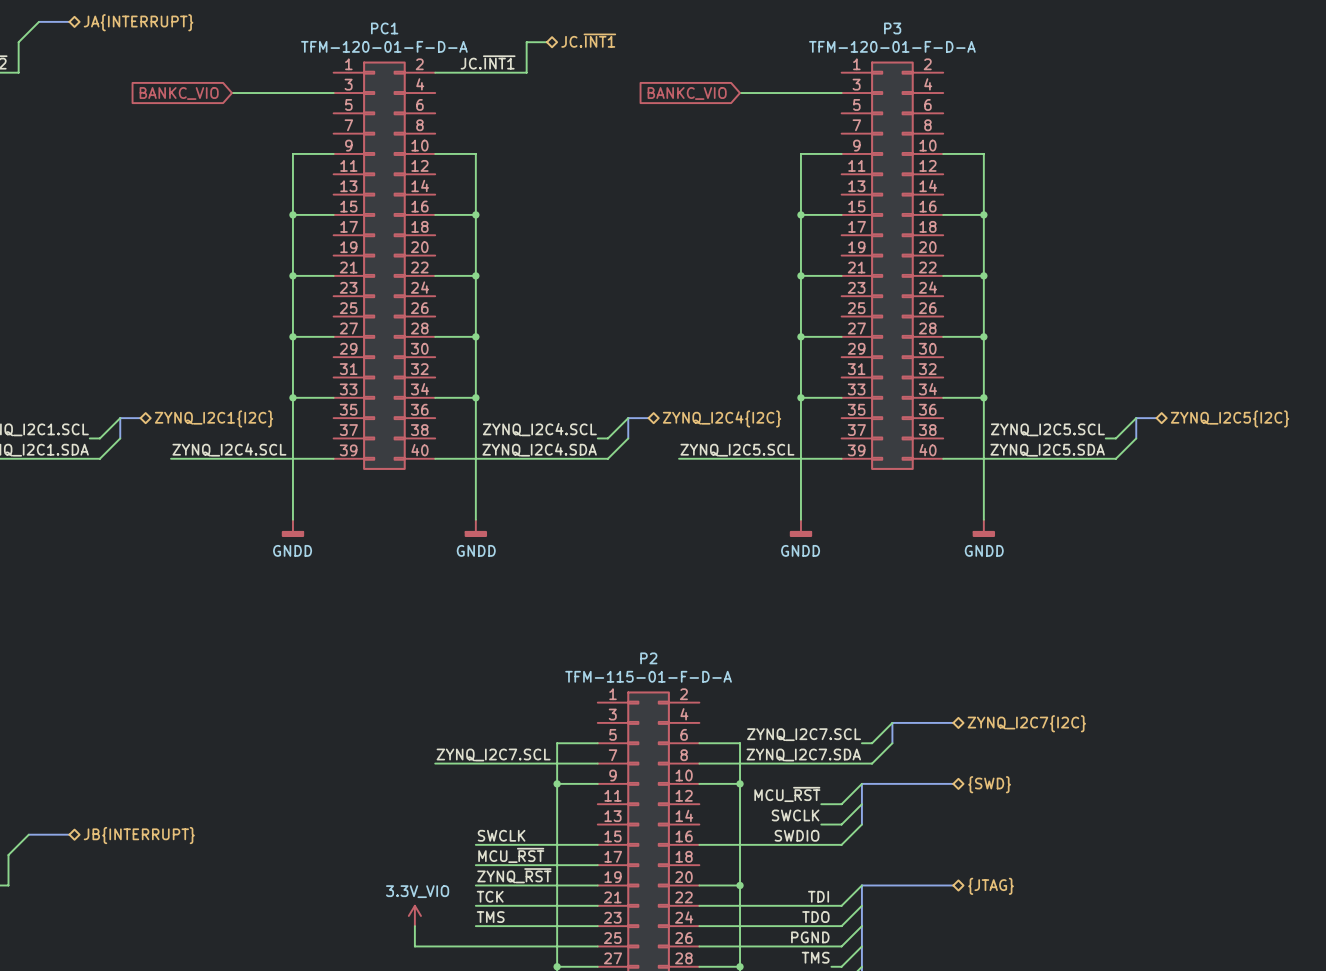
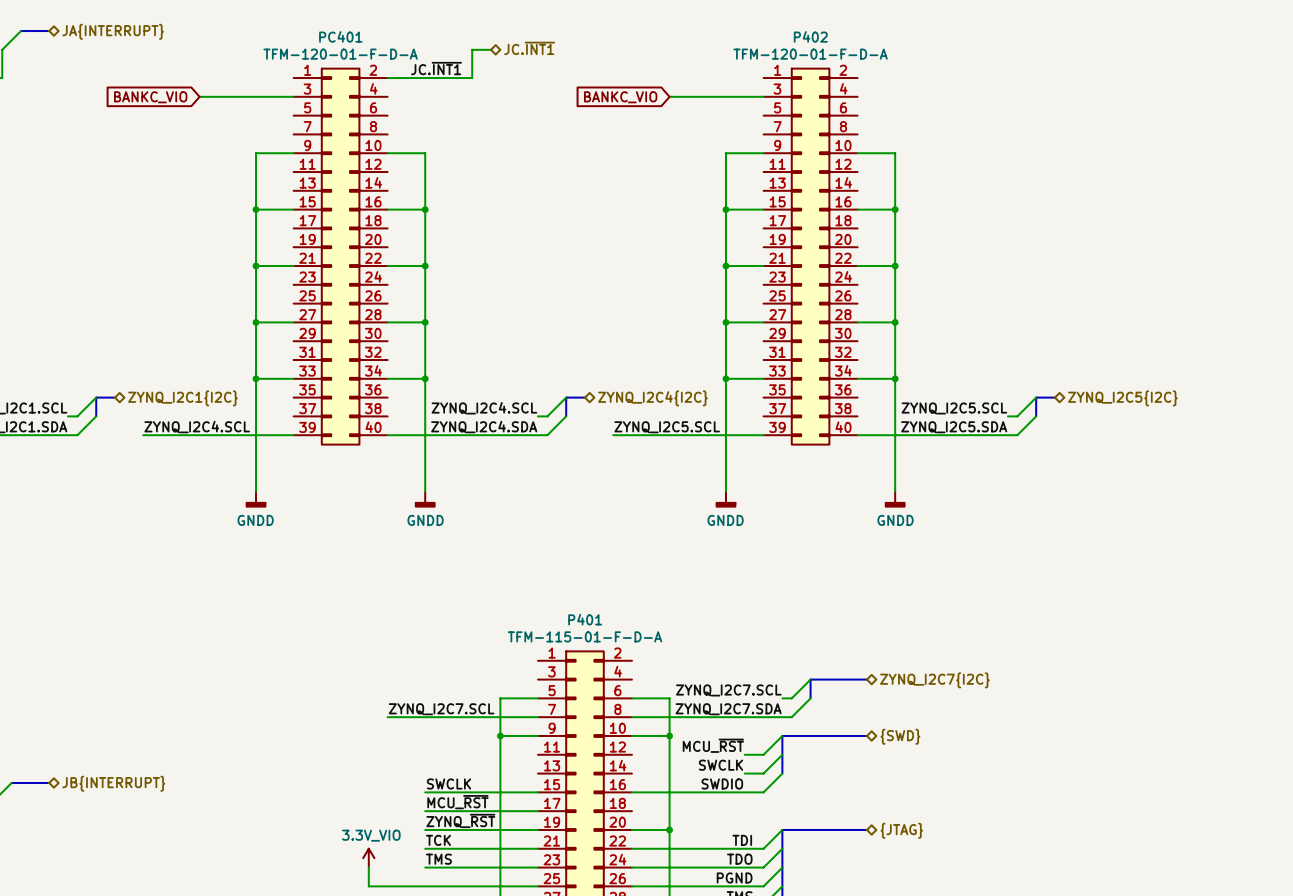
PC1 name: PC1 (384, 28) -> PC401 (340, 36)
P3 name: P3 (892, 28) -> P402 (810, 36)
P2 name: P2 (648, 658) -> P401 (585, 619)

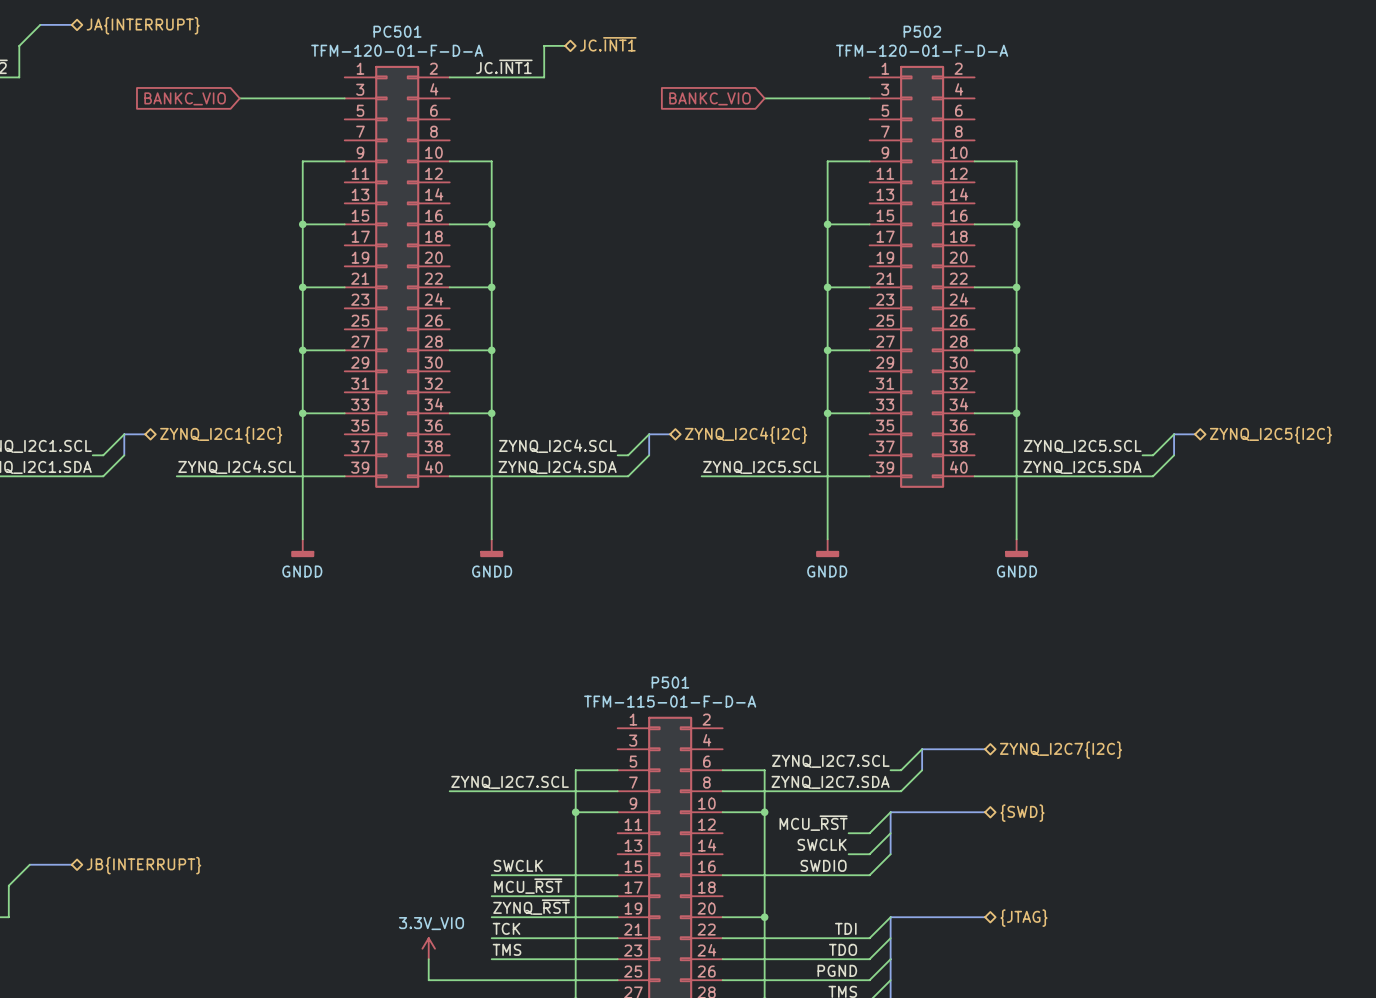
PC401 name: PC401 (340, 36) -> PC501 (397, 31)
P402 name: P402 (810, 36) -> P502 (922, 31)
P401 name: P401 (585, 619) -> P501 (670, 682)

